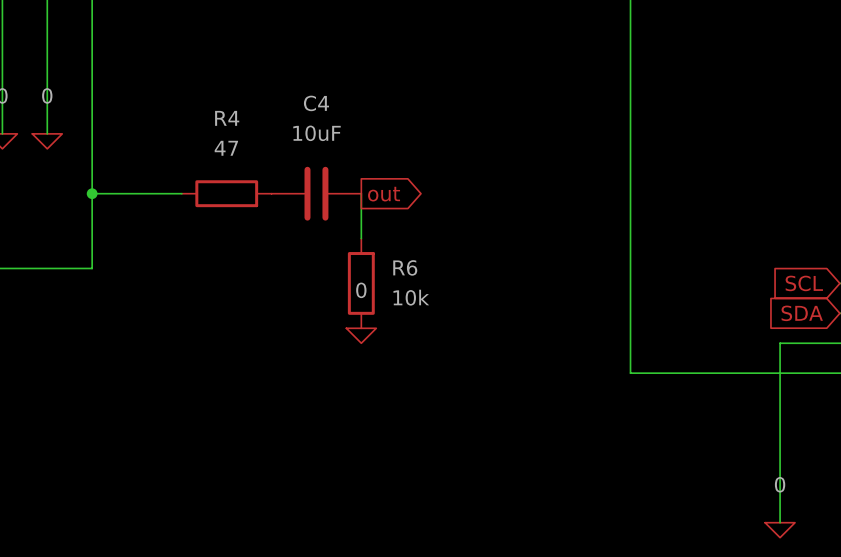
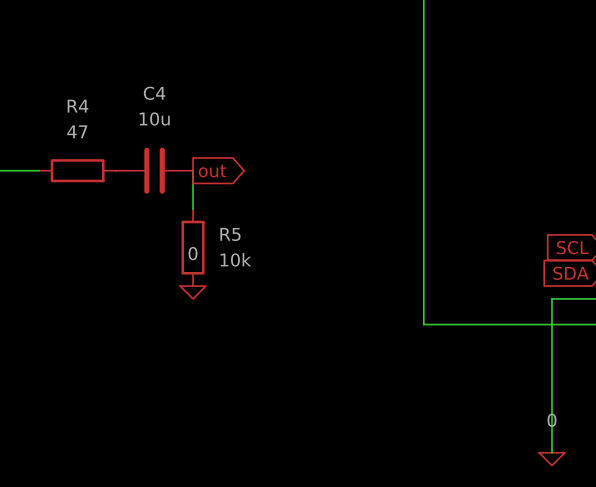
C4 value: 10uF (316, 133) -> 10u (154, 118)
R6 name: R6 (405, 267) -> R5 (230, 234)

